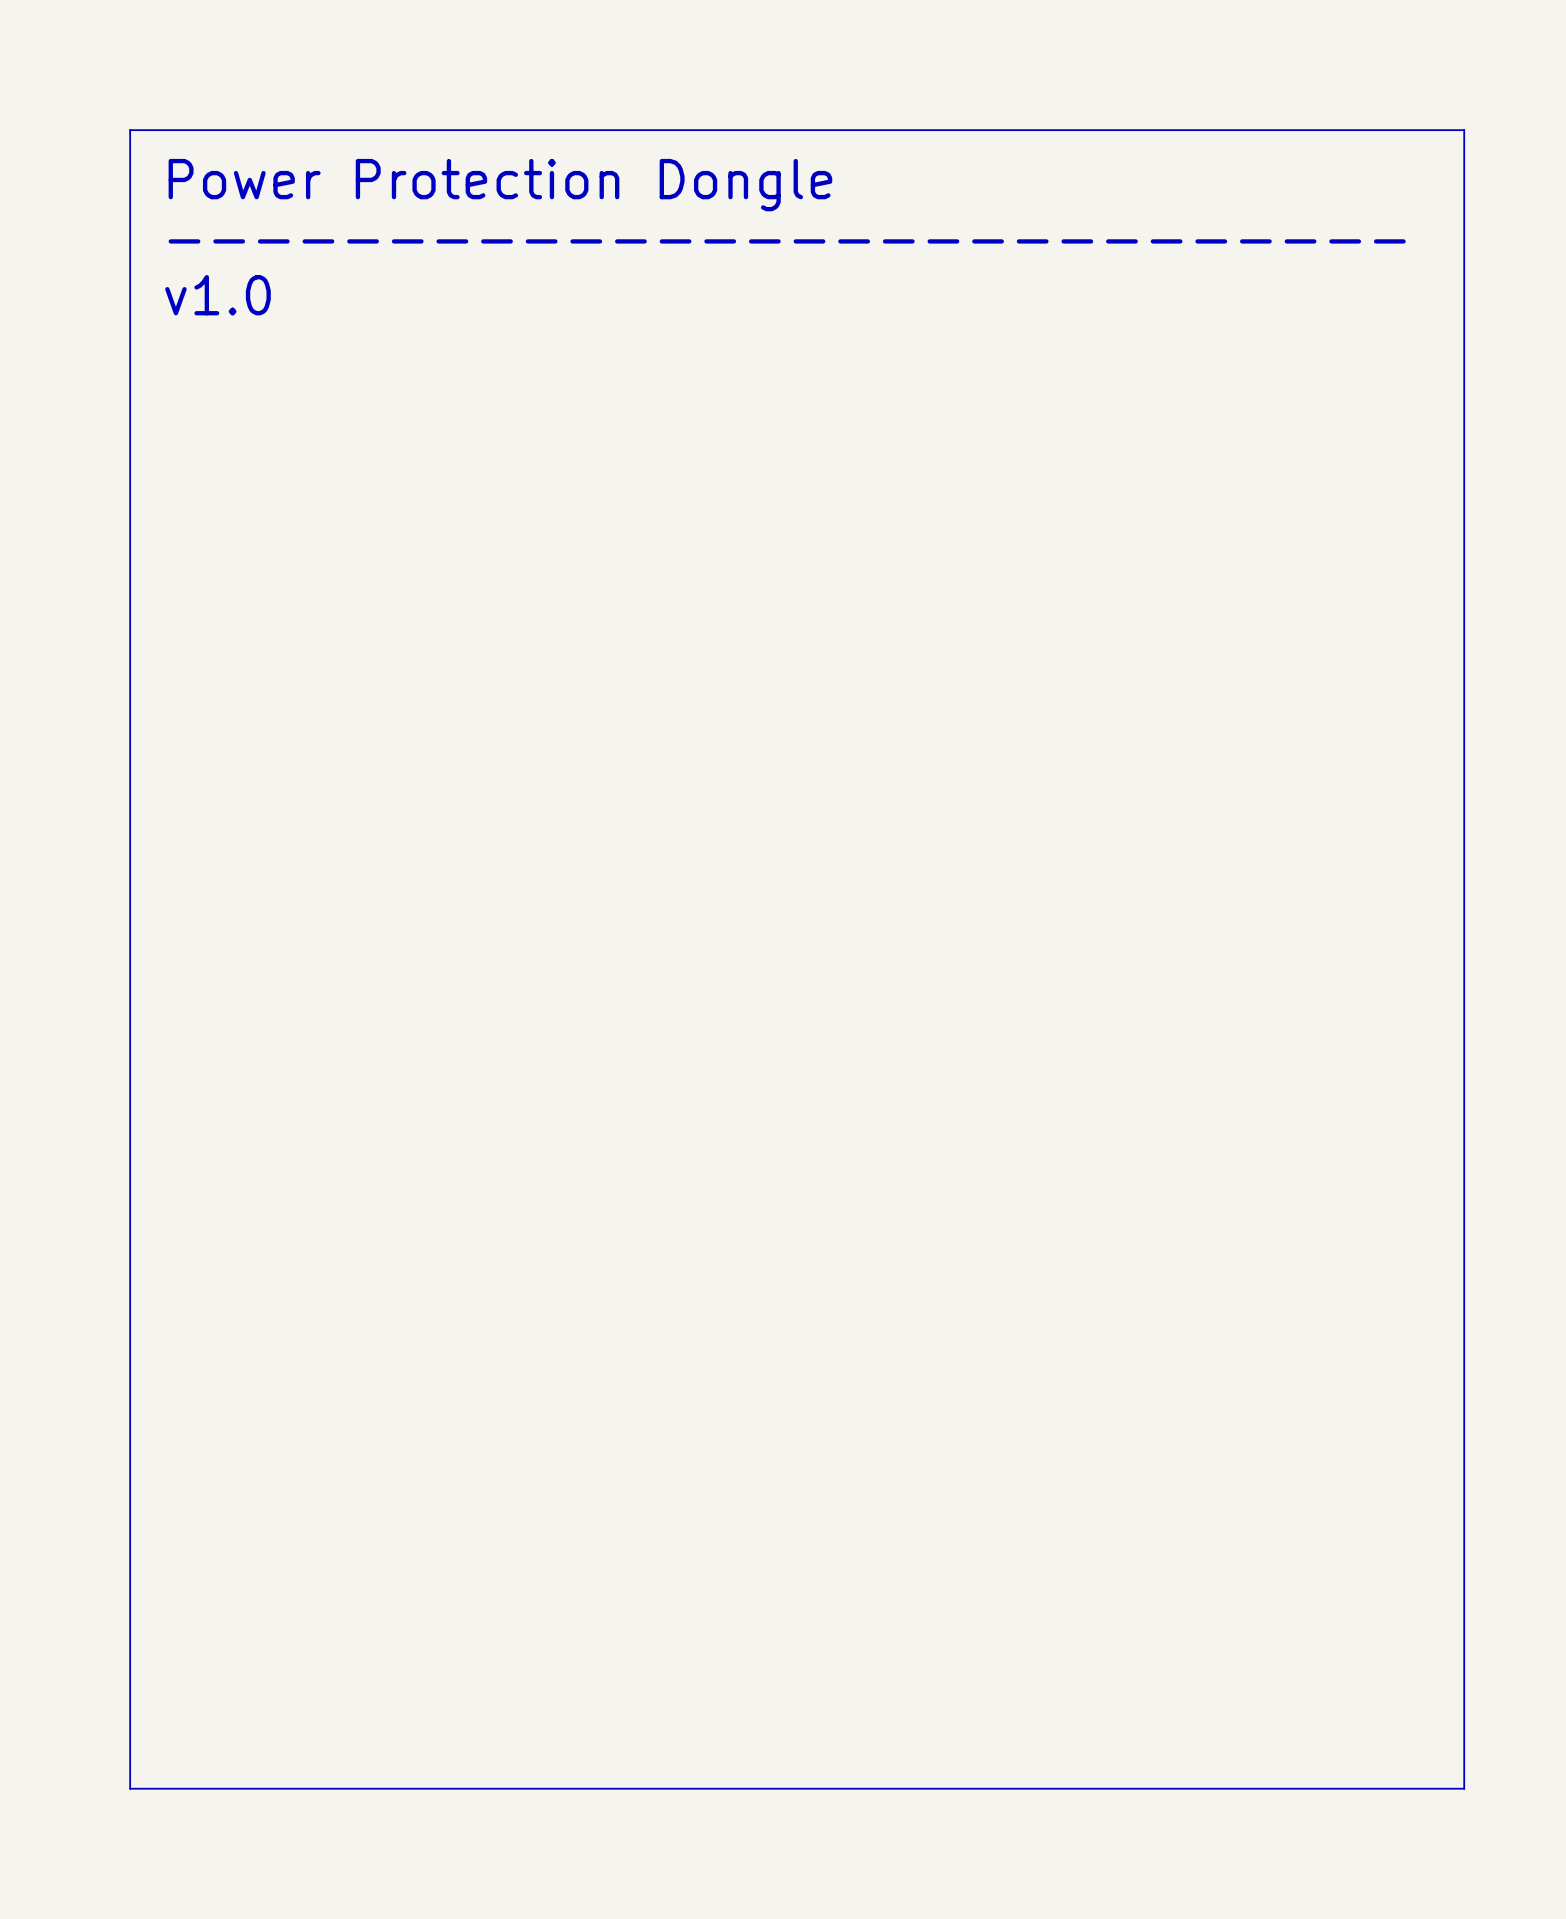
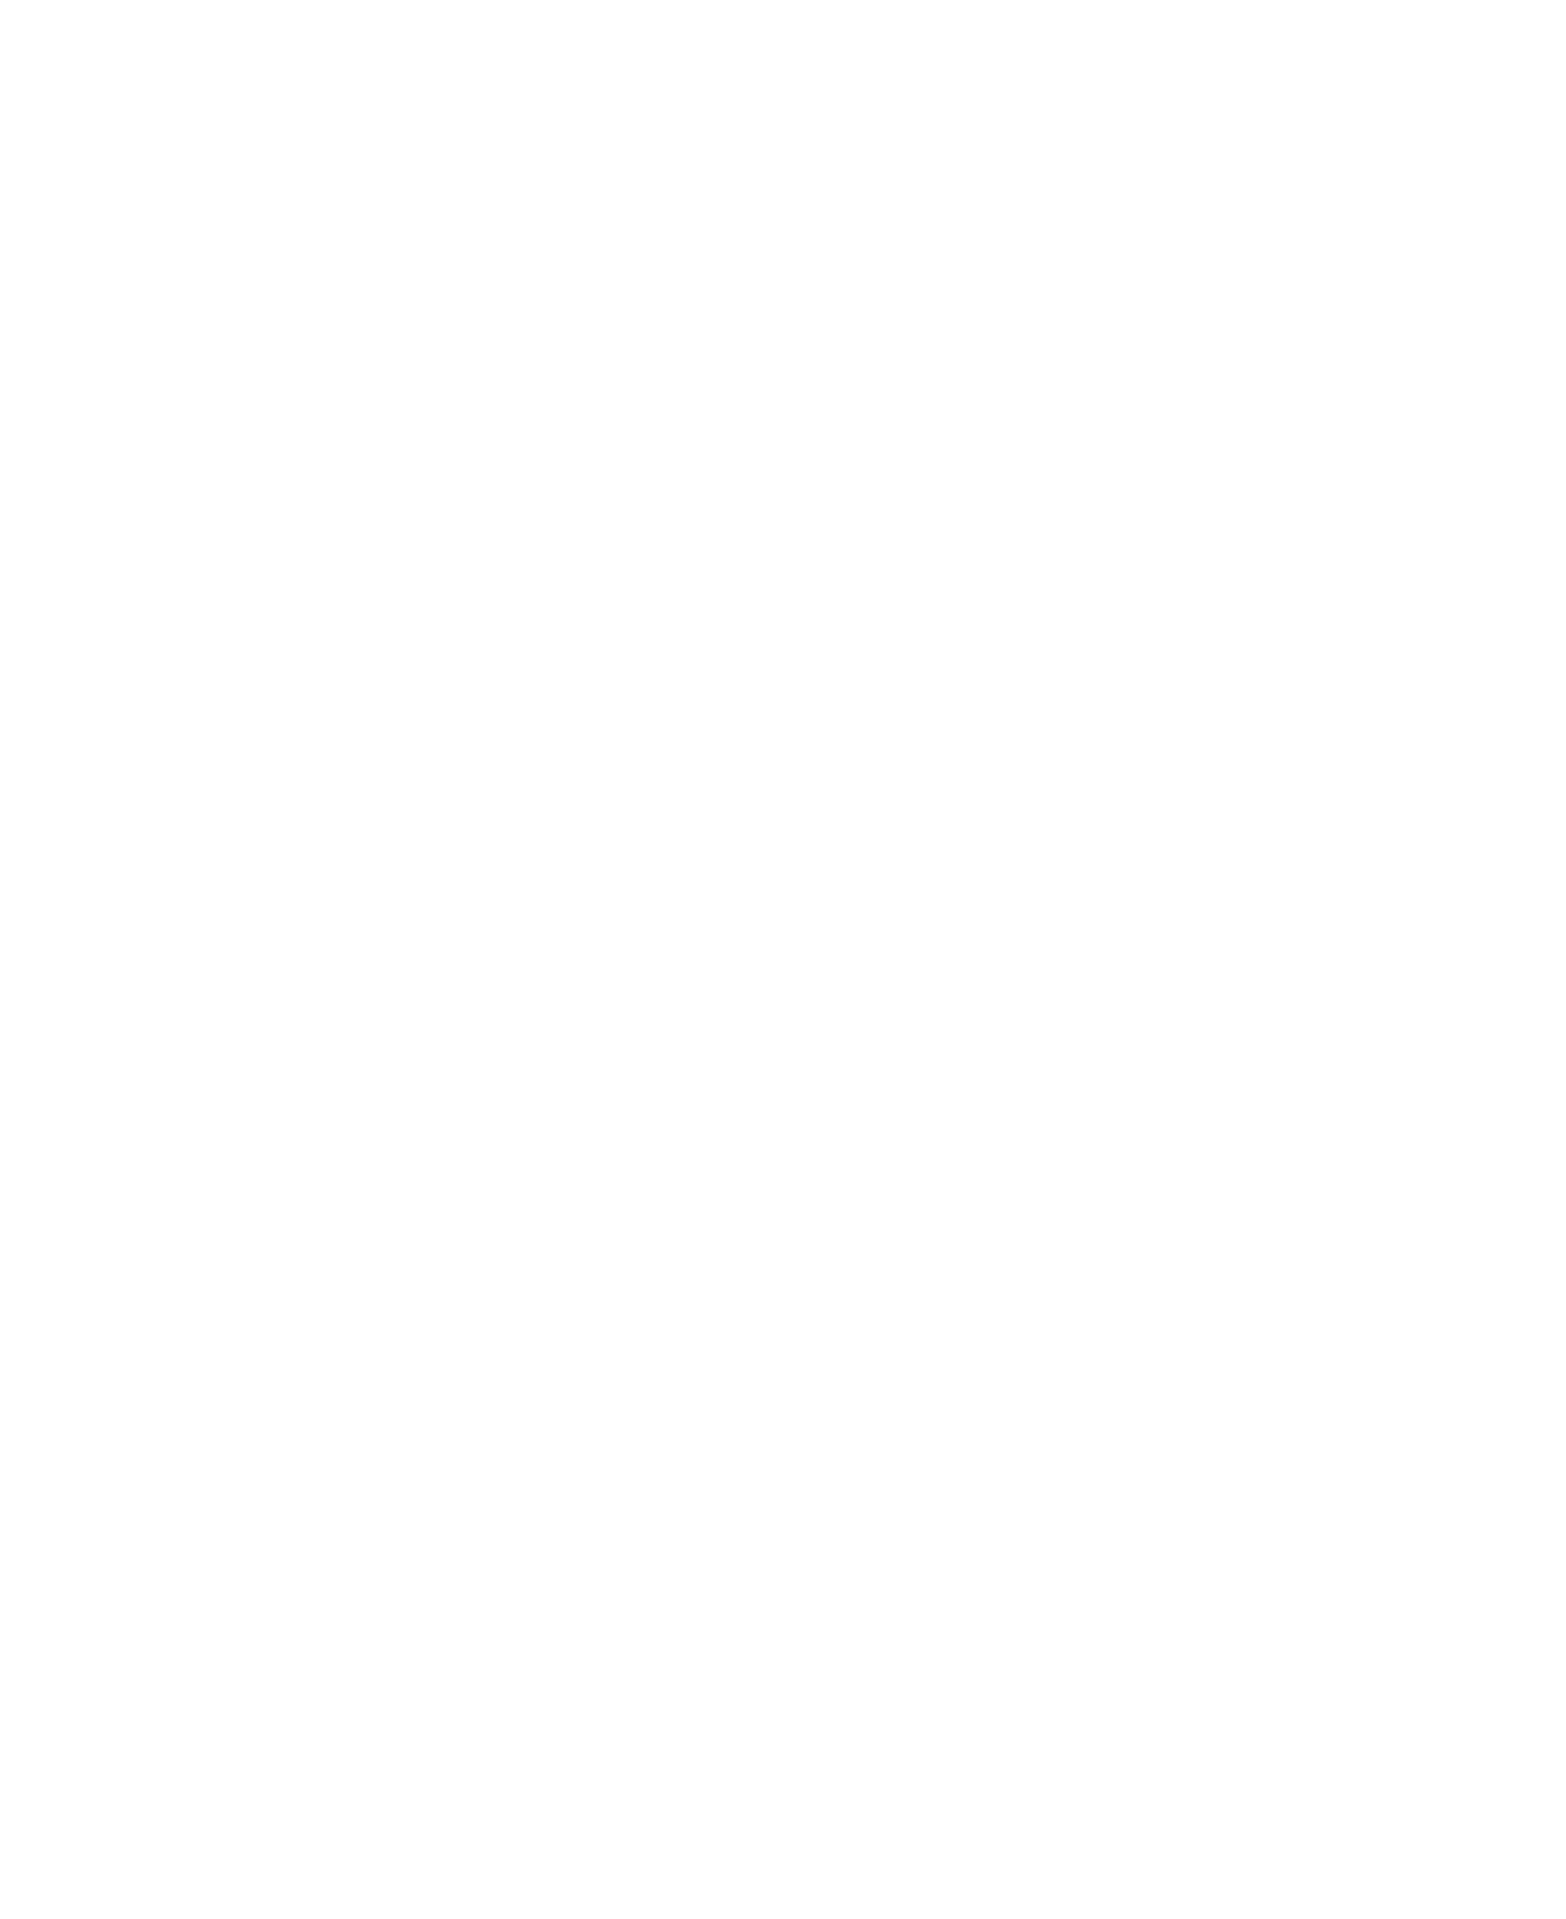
line: (130, 130) (1464, 130) (1464, 1788) (130, 1788) (130, 130) -> none
text: Power Protection Dongle (500, 185) -> none
text: ---------------------------- (787, 241) -> none
text: v1.0 (217, 295) -> none

